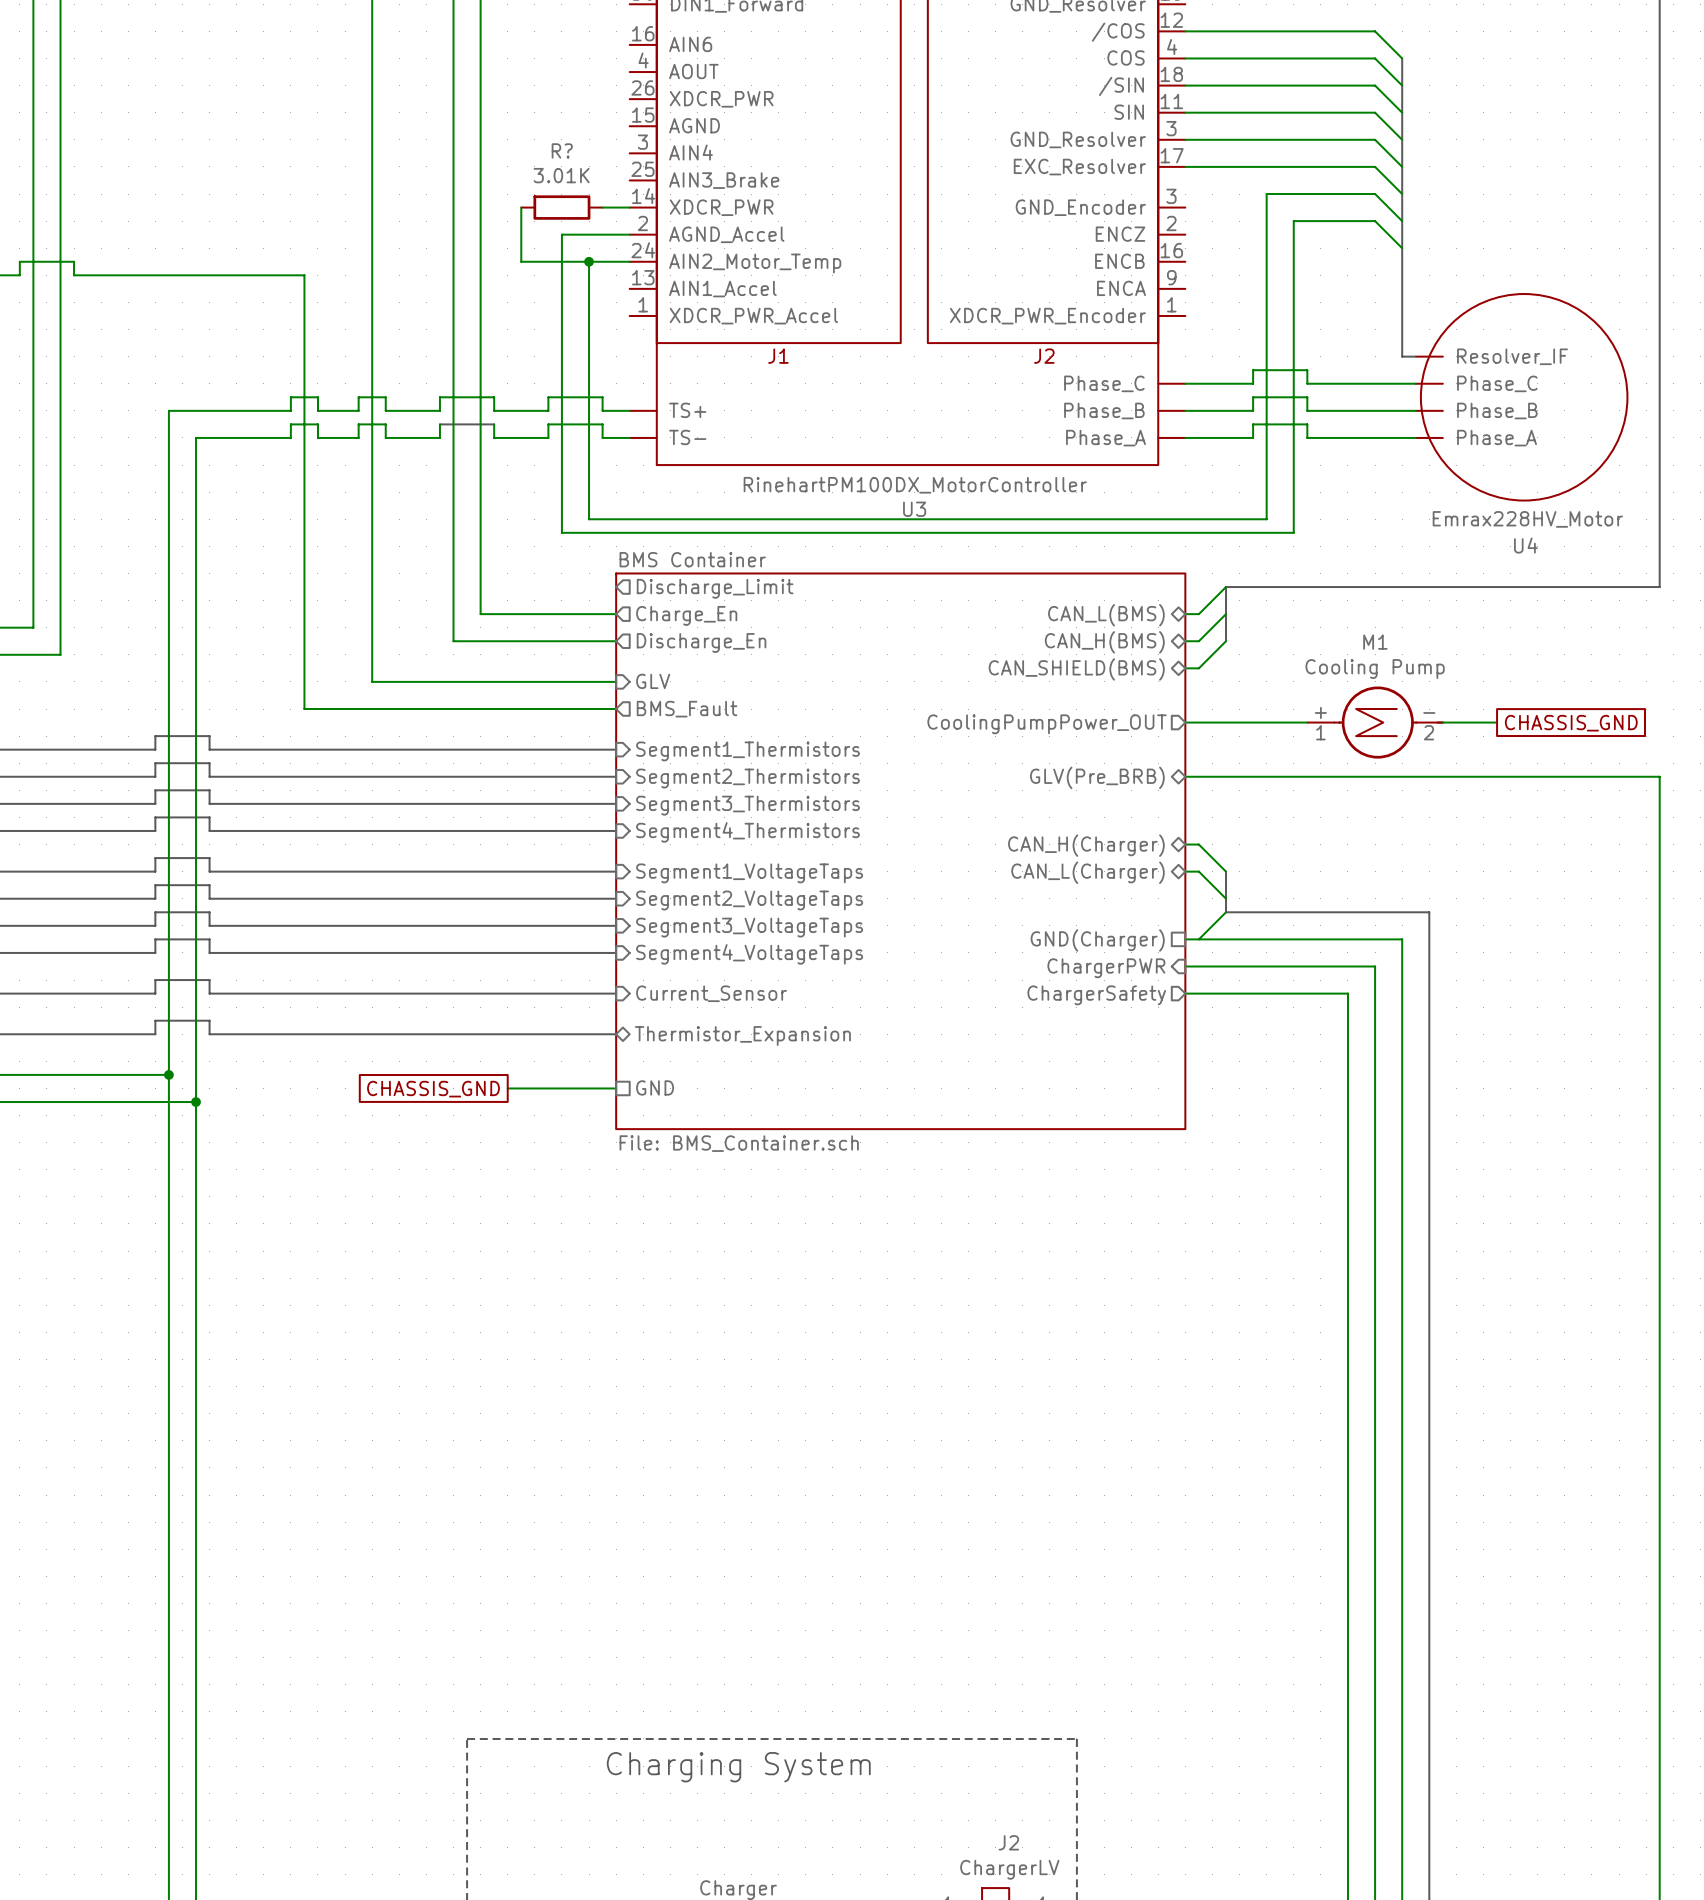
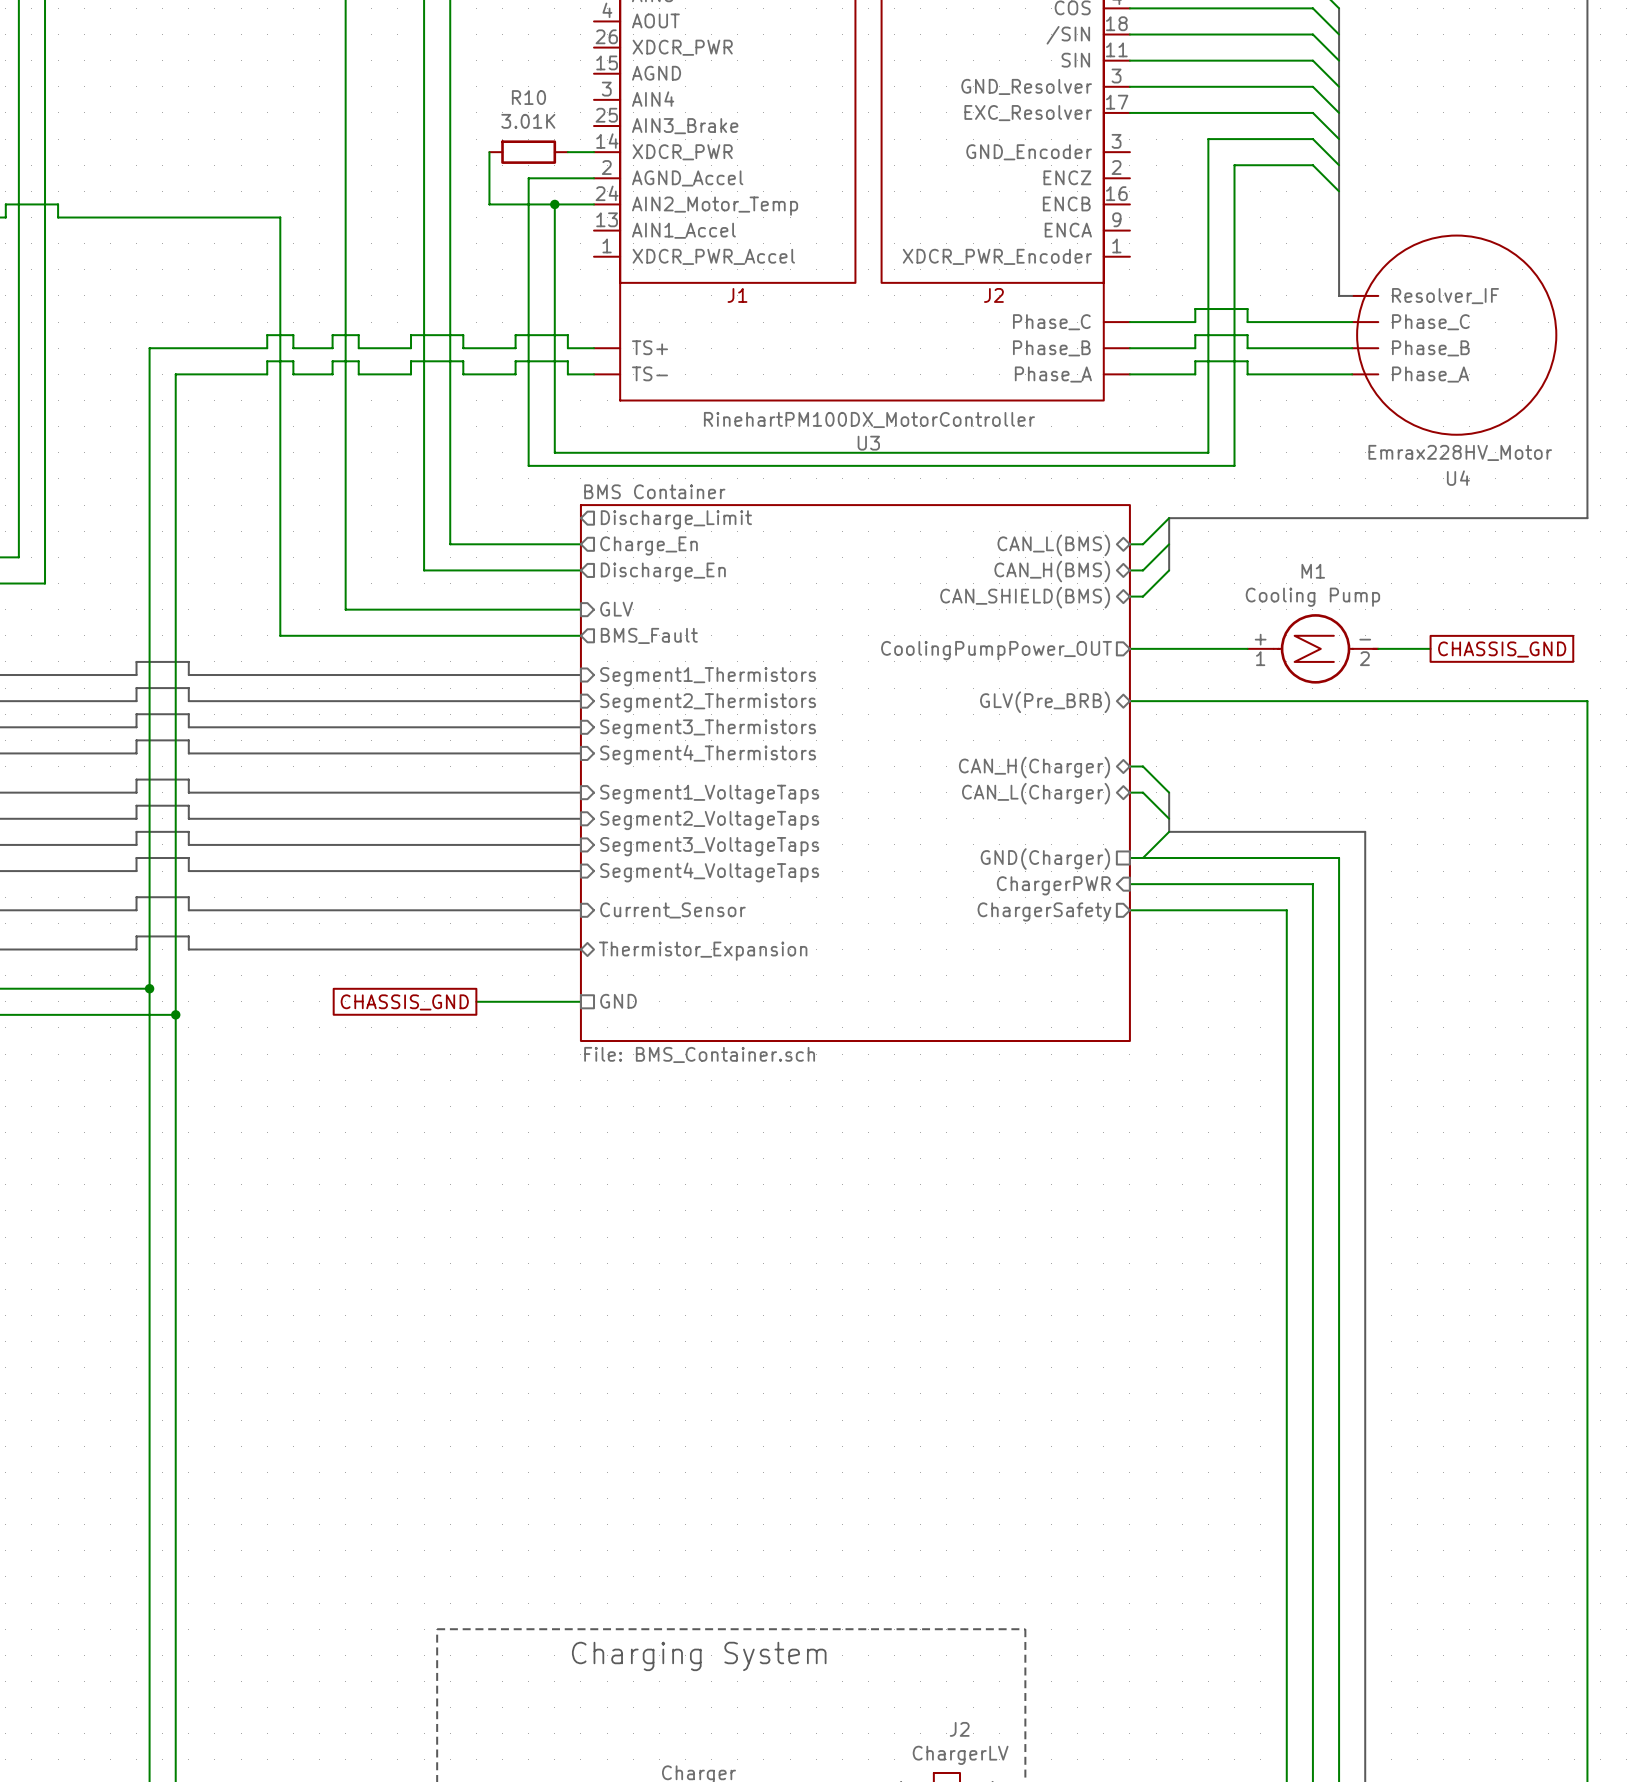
R? name: R? (562, 150) -> R10 (528, 97)
bus: (439, 424) (494, 424) -> none

